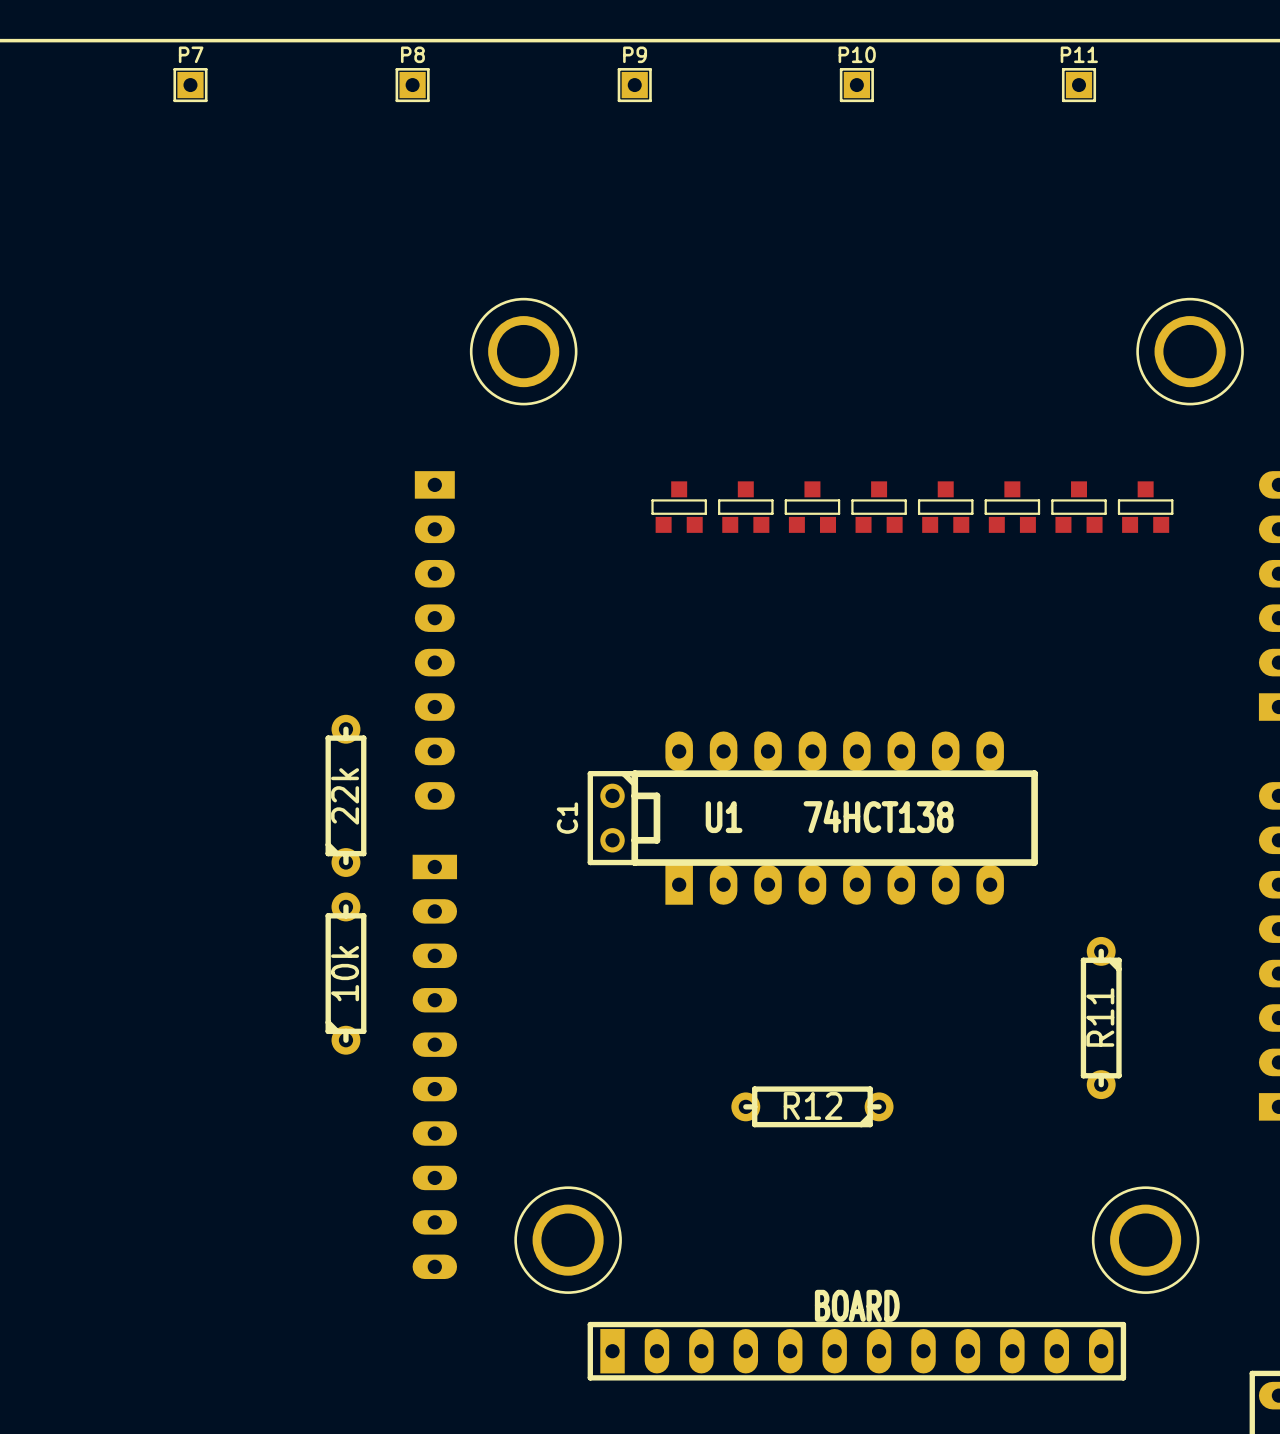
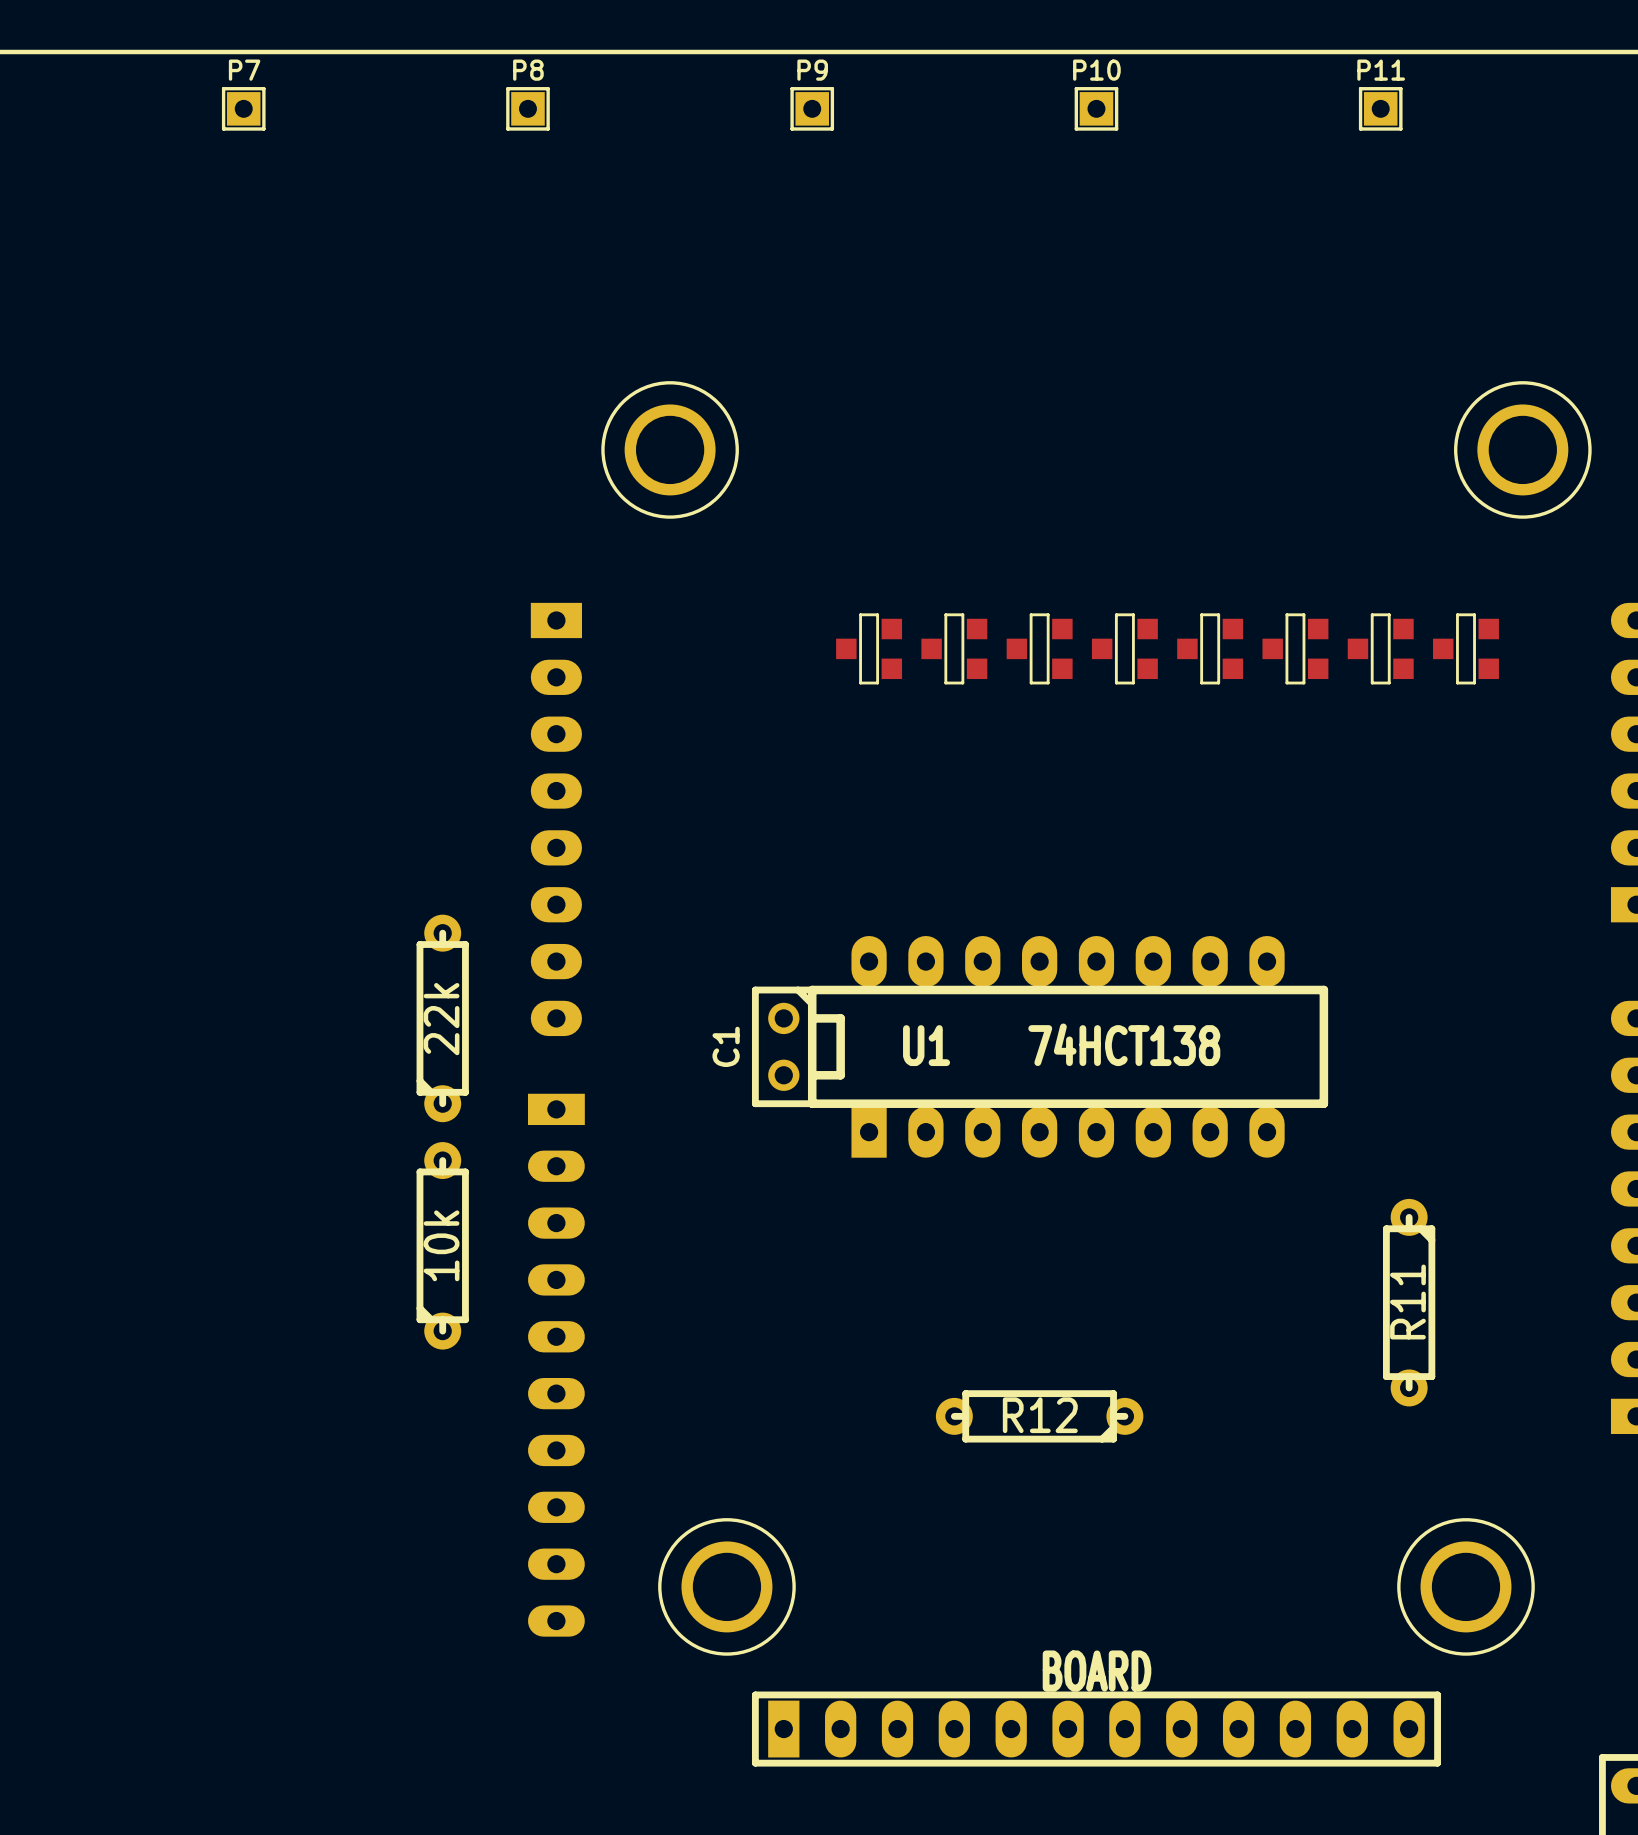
part rotation: 0° (679, 507) -> 90° counterclockwise (869, 648)
part rotation: 0° (745, 507) -> 90° counterclockwise (954, 648)
part rotation: 0° (812, 507) -> 90° counterclockwise (1039, 648)
part rotation: 0° (879, 507) -> 90° counterclockwise (1124, 648)
part rotation: 0° (945, 507) -> 90° counterclockwise (1210, 648)
part rotation: 0° (1012, 507) -> 90° counterclockwise (1295, 648)
part rotation: 0° (1079, 507) -> 90° counterclockwise (1380, 648)
part rotation: 0° (1145, 507) -> 90° counterclockwise (1465, 648)

